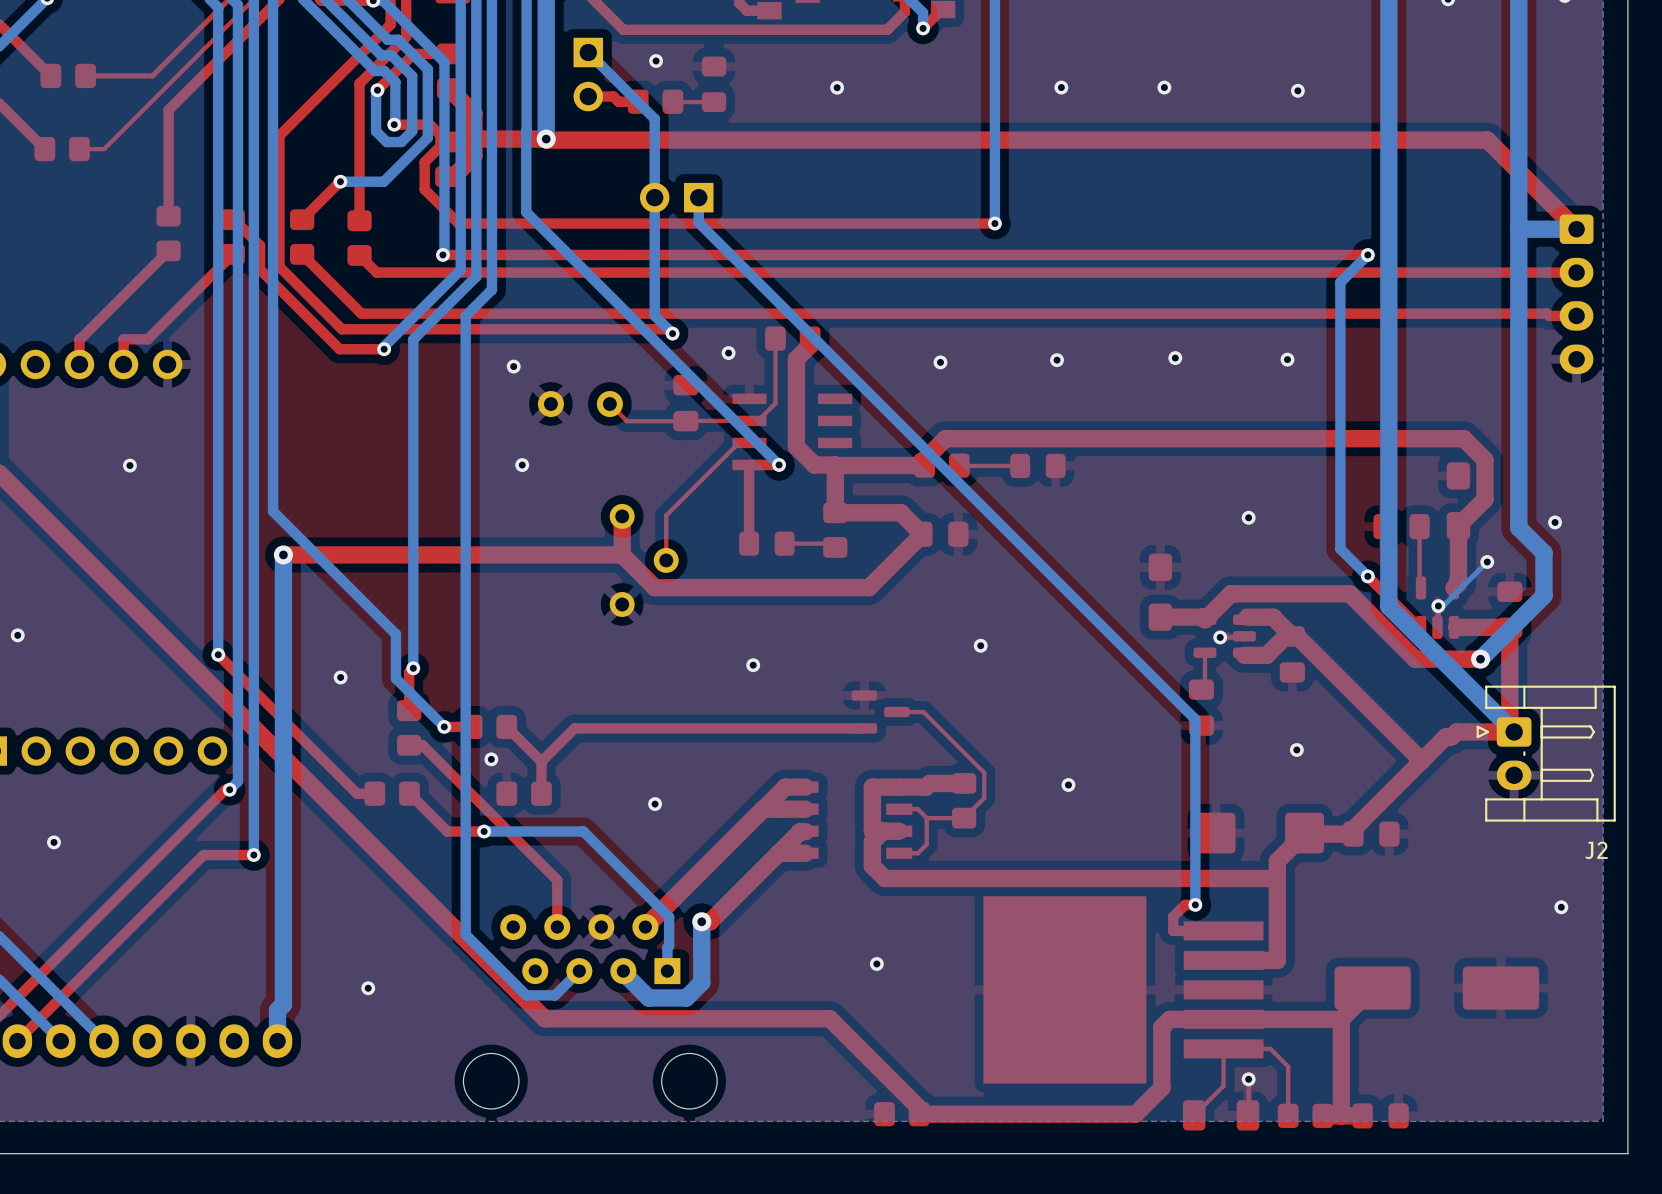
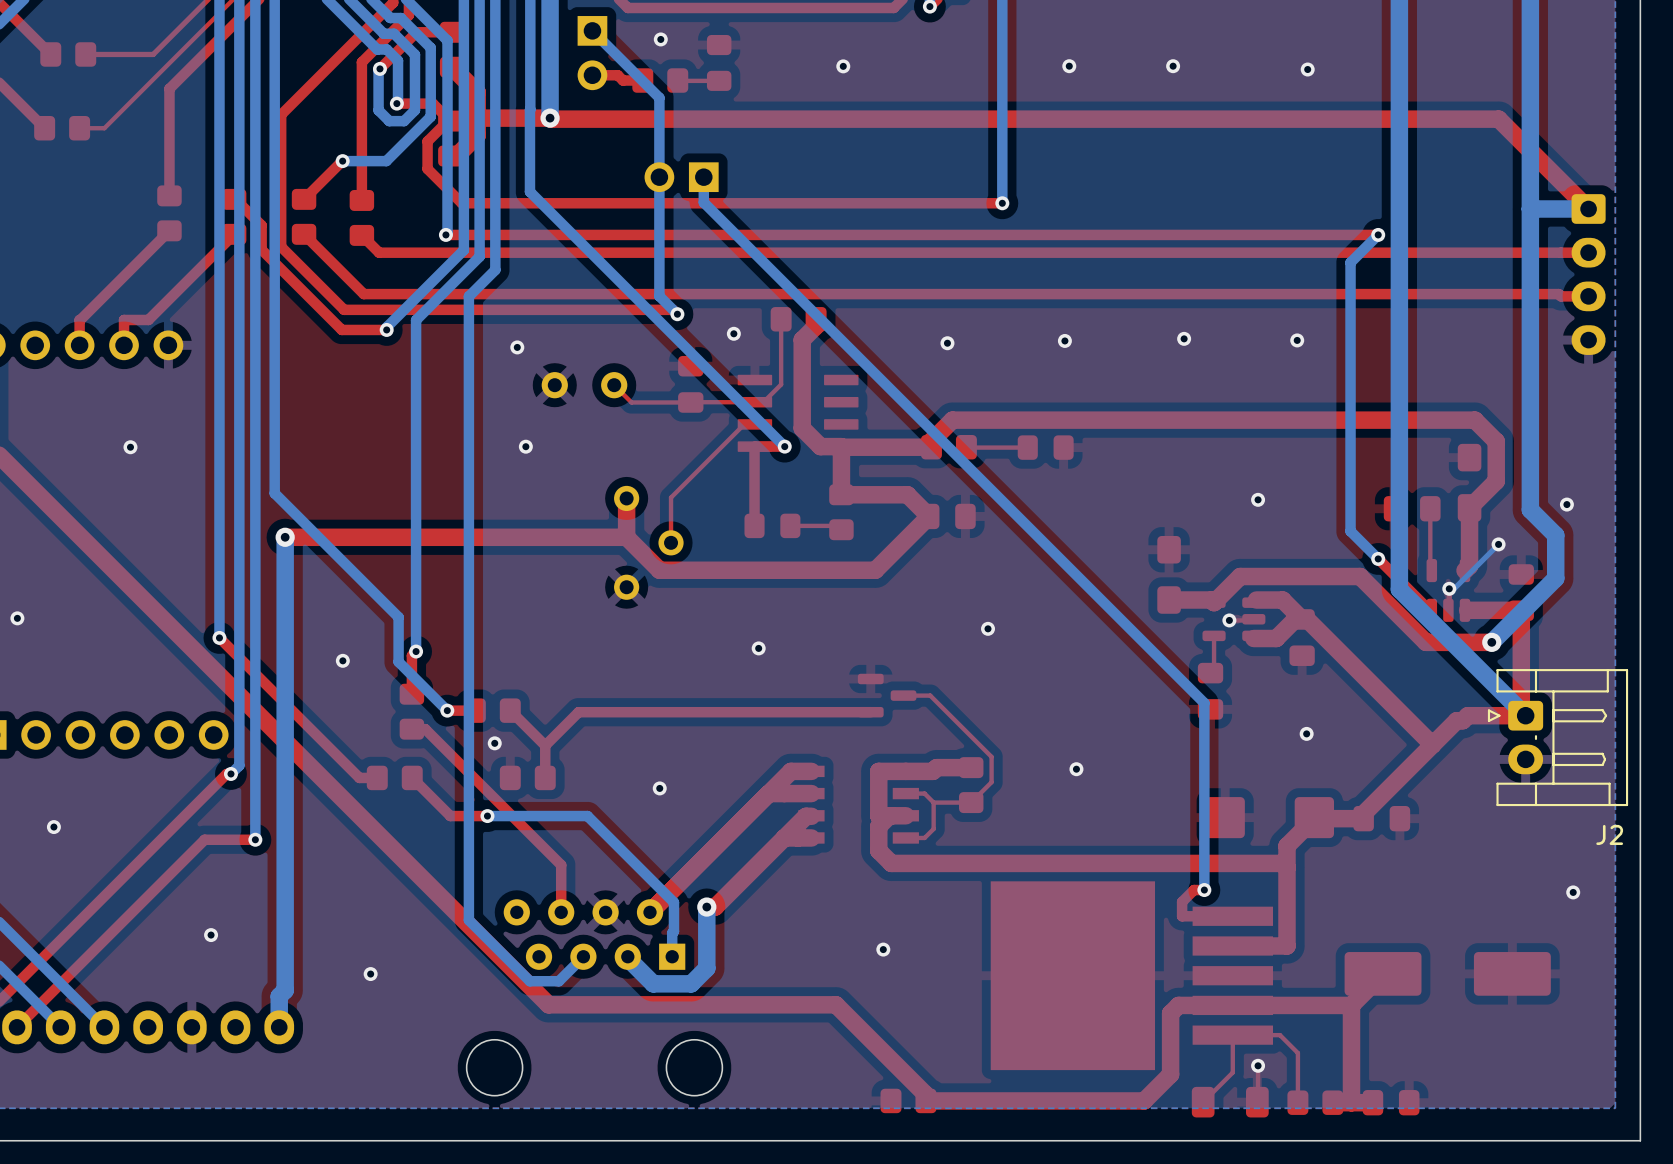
via: none -> (211, 935)

